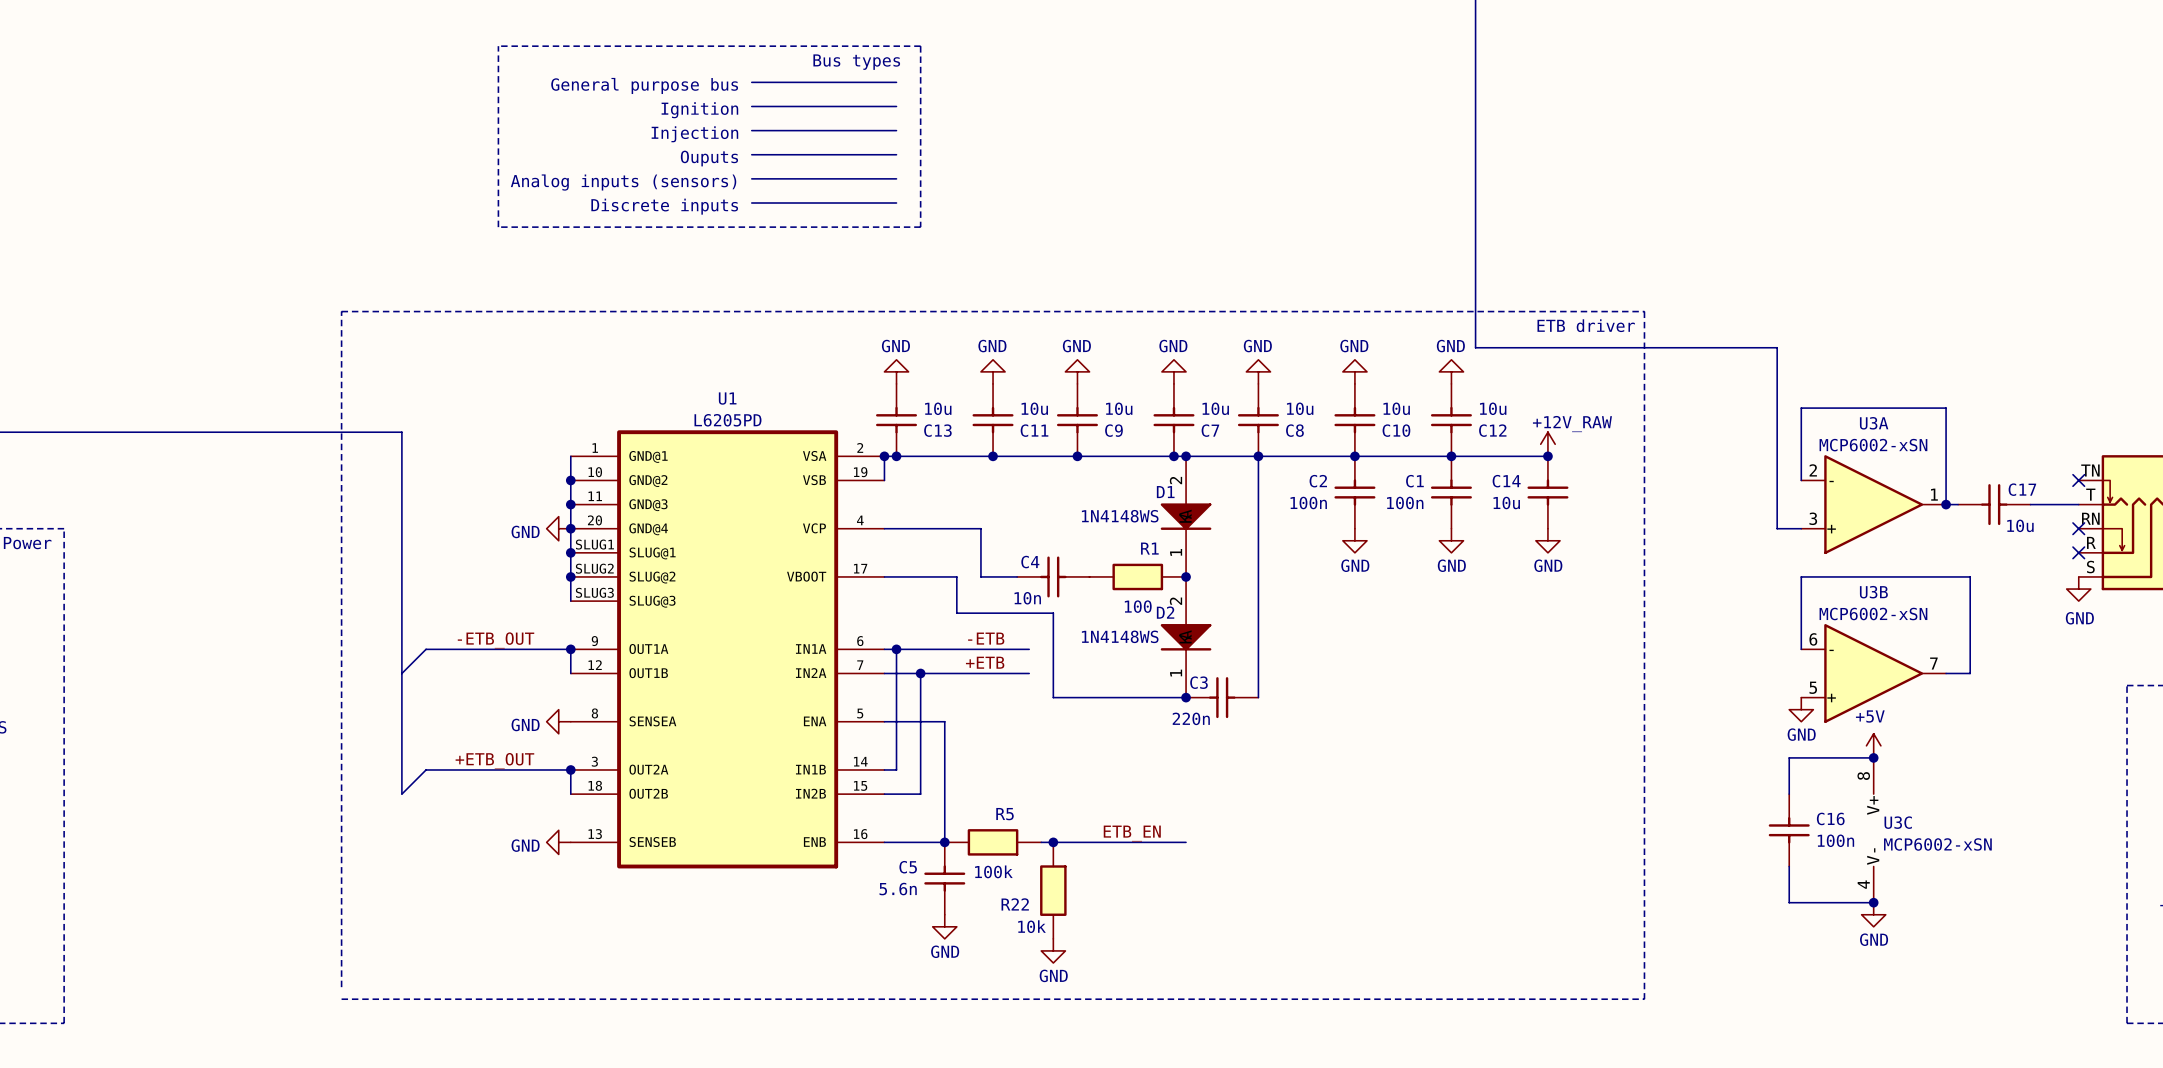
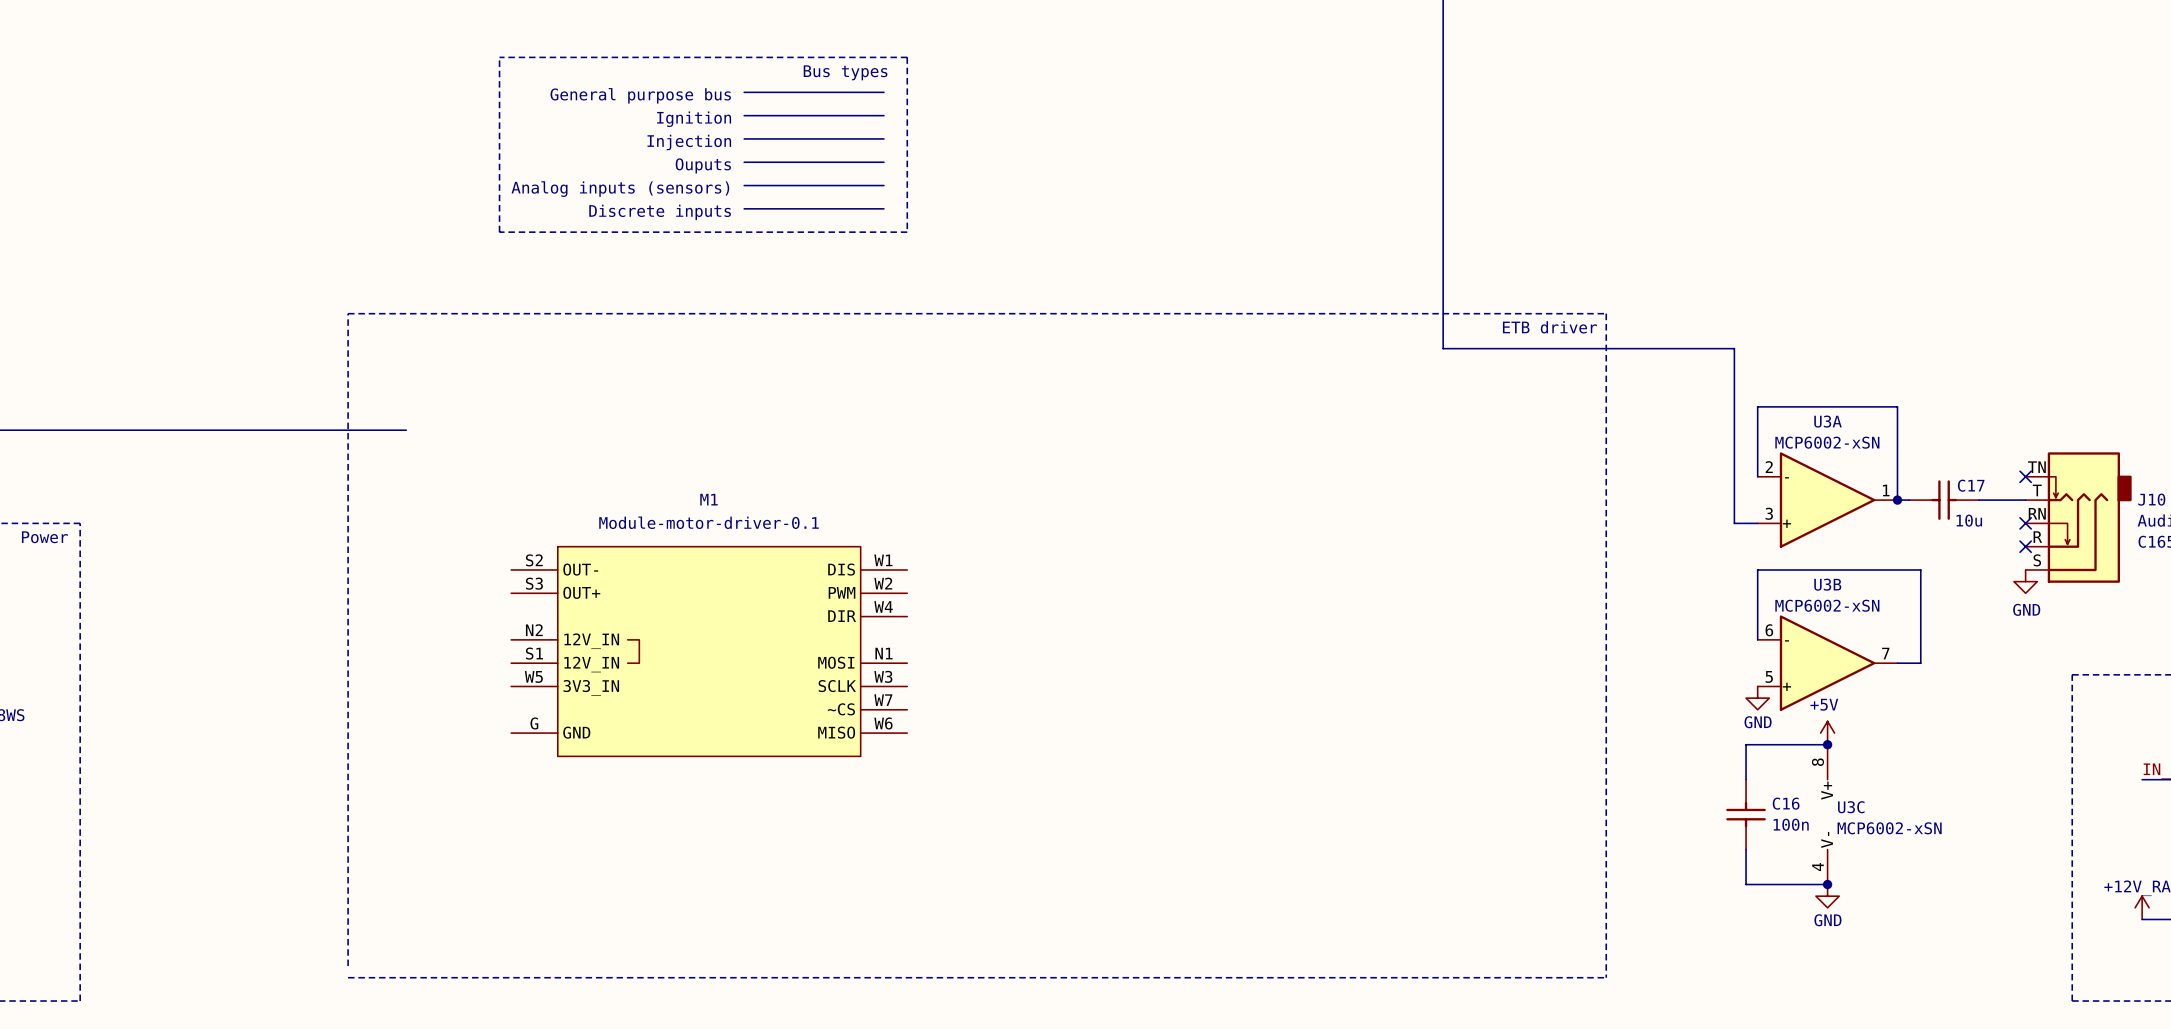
power symbol: GND (896, 371) -> none
power symbol: GND (993, 371) -> none
power symbol: GND (1077, 371) -> none
power symbol: GND (1173, 371) -> none
power symbol: GND (1258, 371) -> none
power symbol: GND (1354, 371) -> none
power symbol: GND (1451, 371) -> none
C13: 10u (896, 420) -> none
C11: 10u (993, 420) -> none
C9: 10u (1077, 420) -> none
C7: 10u (1173, 420) -> none
C8: 10u (1258, 420) -> none
C10: 10u (1354, 420) -> none
C12: 10u (1451, 420) -> none
bus: (401, 432) (401, 794) -> none
power symbol: +12V_RAW (1547, 444) -> none
wire: (570, 456) (570, 601) -> none
junction: (884, 456) -> none
junction: (896, 456) -> none
junction: (993, 456) -> none
junction: (1077, 456) -> none
junction: (1173, 456) -> none
junction: (1186, 456) -> none
wire: (1258, 456) (1258, 697) -> none
junction: (1258, 456) -> none
junction: (1354, 456) -> none
junction: (1451, 456) -> none
wire: (1547, 456) (884, 456) (884, 480) -> none
junction: (1547, 456) -> none
junction: (570, 480) -> none
C2: 100n (1354, 492) -> none
C1: 100n (1451, 492) -> none
C14: 10u (1547, 492) -> none
junction: (570, 504) -> none
D1: 1N4148WS (1186, 516) -> none
power symbol: GND (558, 528) -> none
junction: (570, 528) -> none
wire: (884, 528) (980, 528) (980, 576) (1017, 576) -> none
power symbol: GND (1354, 540) -> none
power symbol: GND (1451, 540) -> none
power symbol: GND (1547, 540) -> none
junction: (570, 552) -> none
junction: (570, 576) -> none
wire: (884, 576) (956, 576) (956, 613) (1053, 613) (1053, 697) (1186, 697) -> none
C4: 10n (1053, 576) -> none
R1: 100 (1137, 576) -> none
junction: (1186, 576) -> none
D2: 1N4148WS (1186, 637) -> none
label: -ETB (986, 638) -> none
label: -ETB_OUT (496, 640) -> none
junction: (570, 649) -> none
U1: L6205PD (727, 649) -> none
wire: (884, 649) (1029, 649) -> none
wire: (896, 649) (896, 769) (884, 769) -> none
junction: (896, 649) -> none
M1: none -> Module-motor-driver-0.1 (709, 651)
label: +ETB (985, 662) -> none
wire: (401, 673) (426, 649) (570, 649) (570, 673) -> none
wire: (884, 673) (1029, 673) -> none
wire: (920, 673) (920, 794) (884, 794) -> none
junction: (920, 673) -> none
junction: (1186, 697) -> none
C3: 220n (1222, 697) -> none
power symbol: GND (558, 721) -> none
wire: (884, 721) (944, 721) (944, 842) (884, 842) -> none
label: +ETB_OUT (494, 761) -> none
junction: (570, 769) -> none
wire: (401, 794) (426, 769) (570, 769) (570, 794) -> none
label: ETB_EN (1132, 833) -> none
power symbol: GND (558, 842) -> none
junction: (944, 842) -> none
R5: 100k (993, 842) -> none
wire: (1041, 842) (1186, 842) -> none
junction: (1053, 842) -> none
C5: 5.6n (944, 878) -> none
R22: 10k (1053, 890) -> none
power symbol: GND (944, 926) -> none
power symbol: GND (1053, 950) -> none

